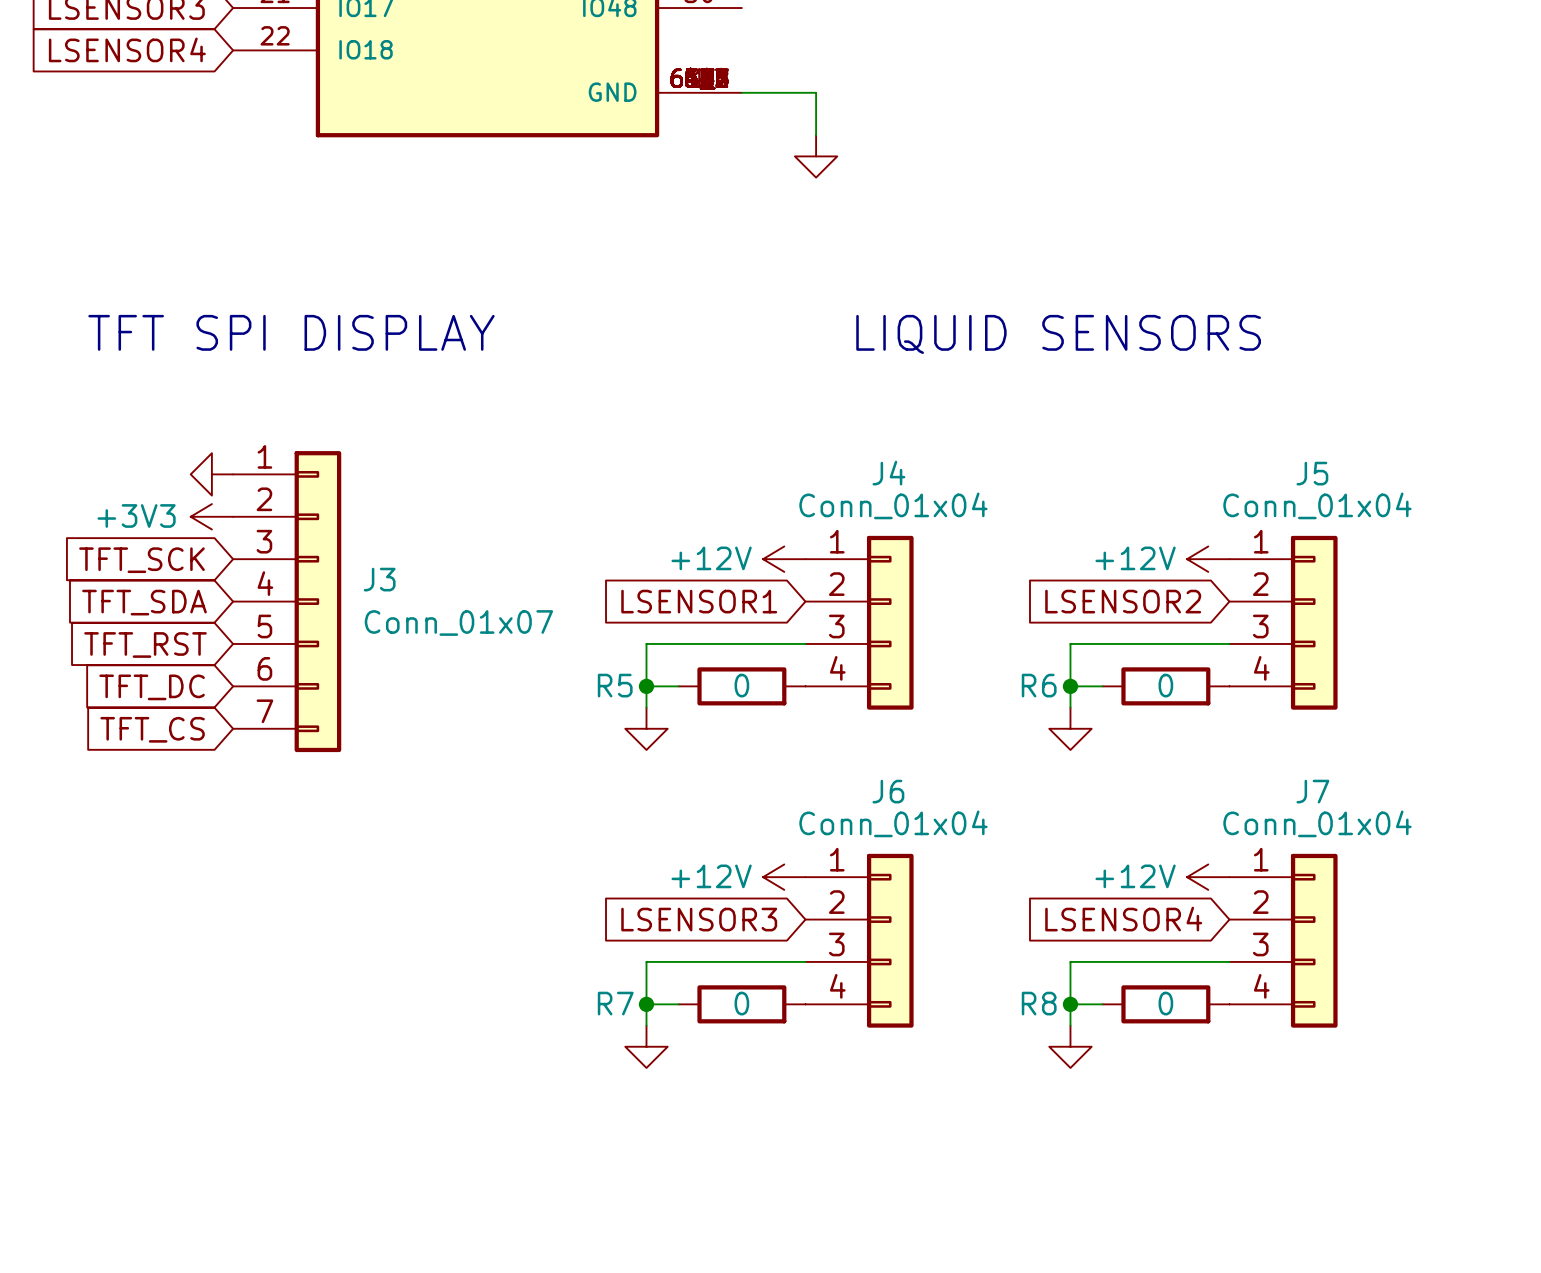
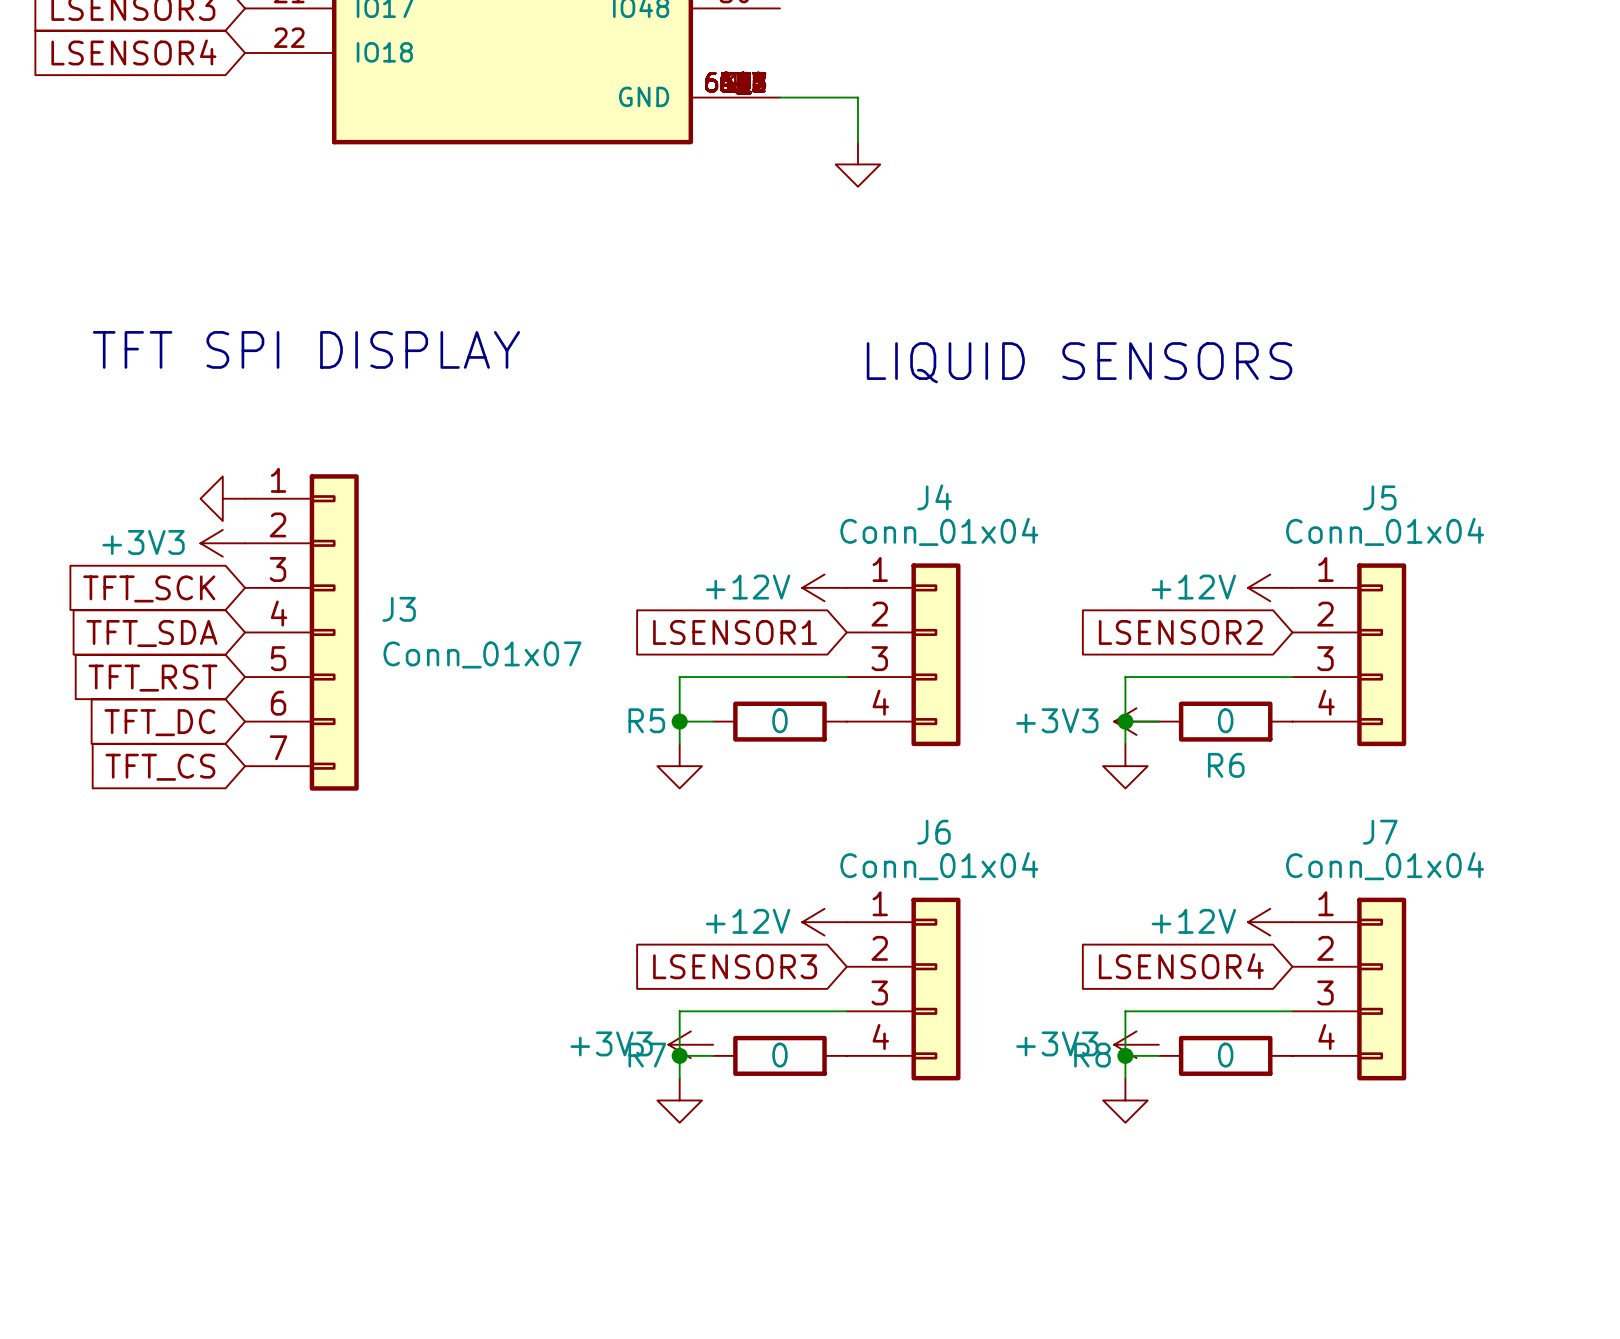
text position: LIQUID SENSORS (1058, 334) -> LIQUID SENSORS (1079, 362)
R6 name position: R6 (1039, 685) -> R6 (1226, 765)
power symbol: none -> +3V3 (1136, 721)
power symbol: none -> +3V3 (690, 1044)
power symbol: none -> +3V3 (1136, 1044)

